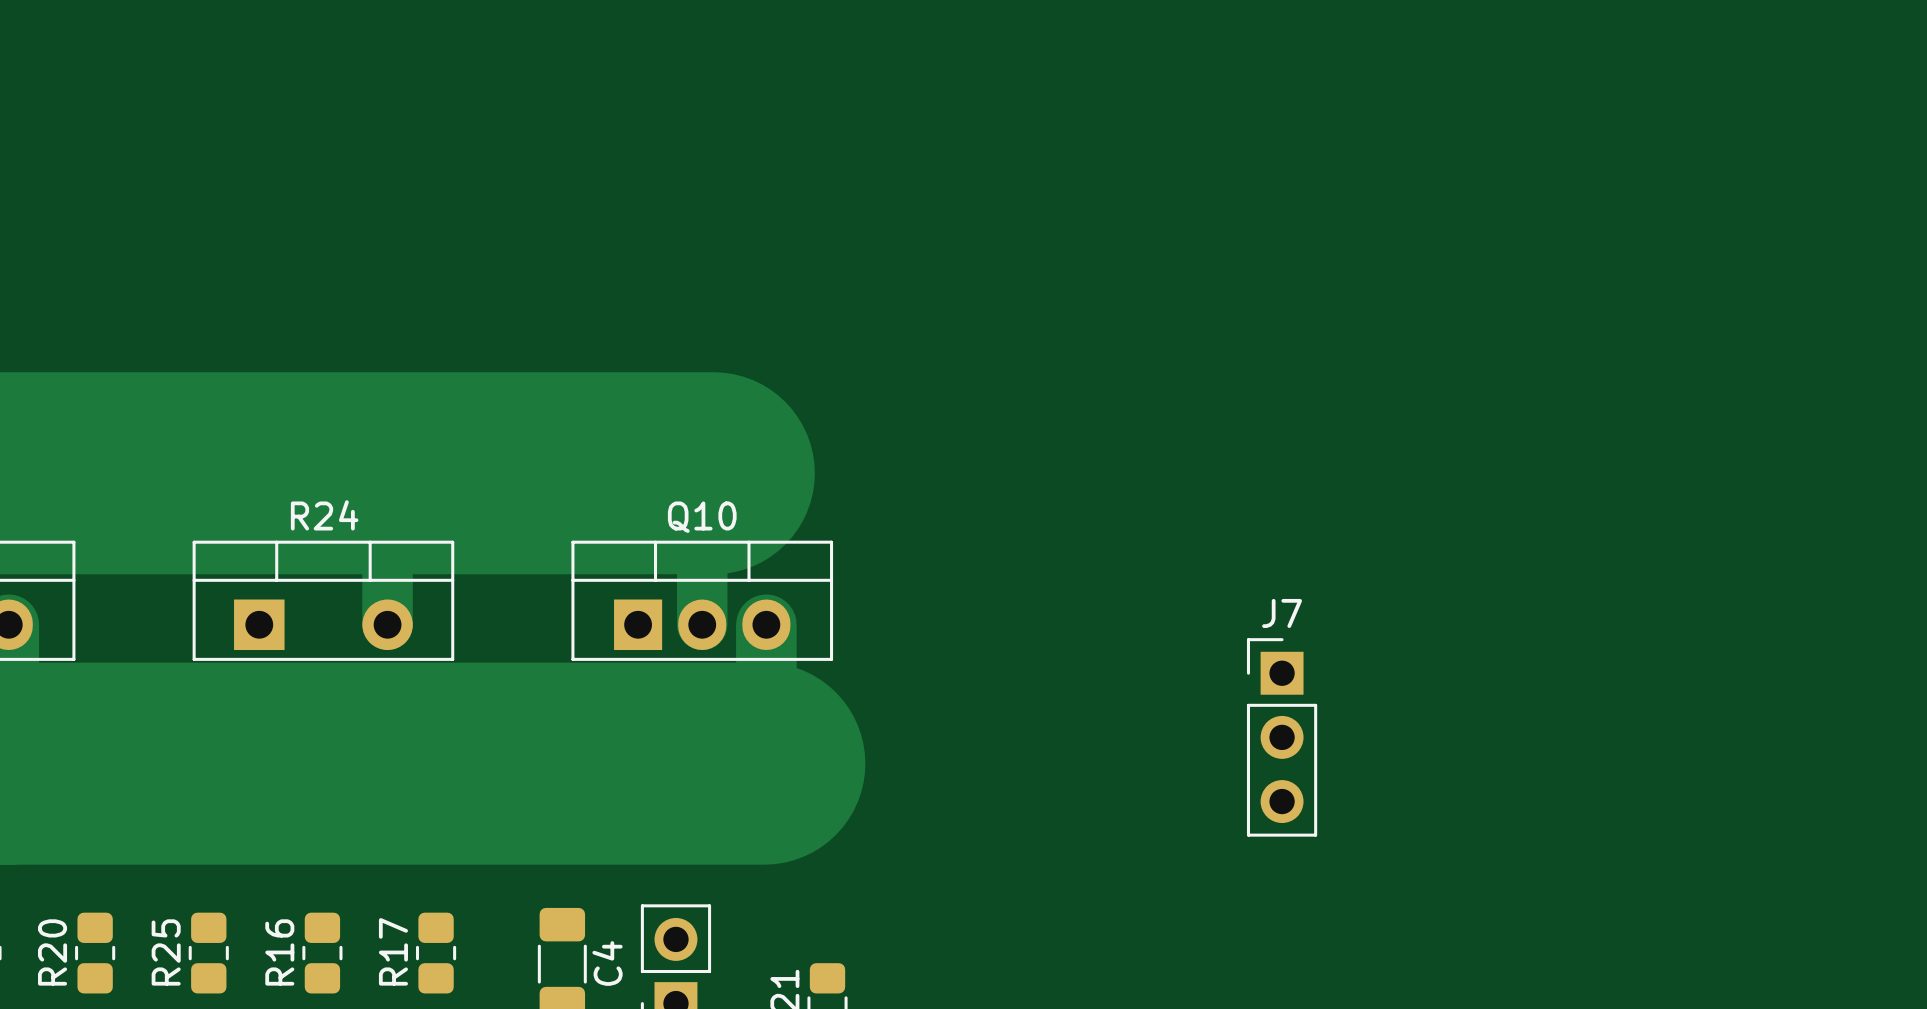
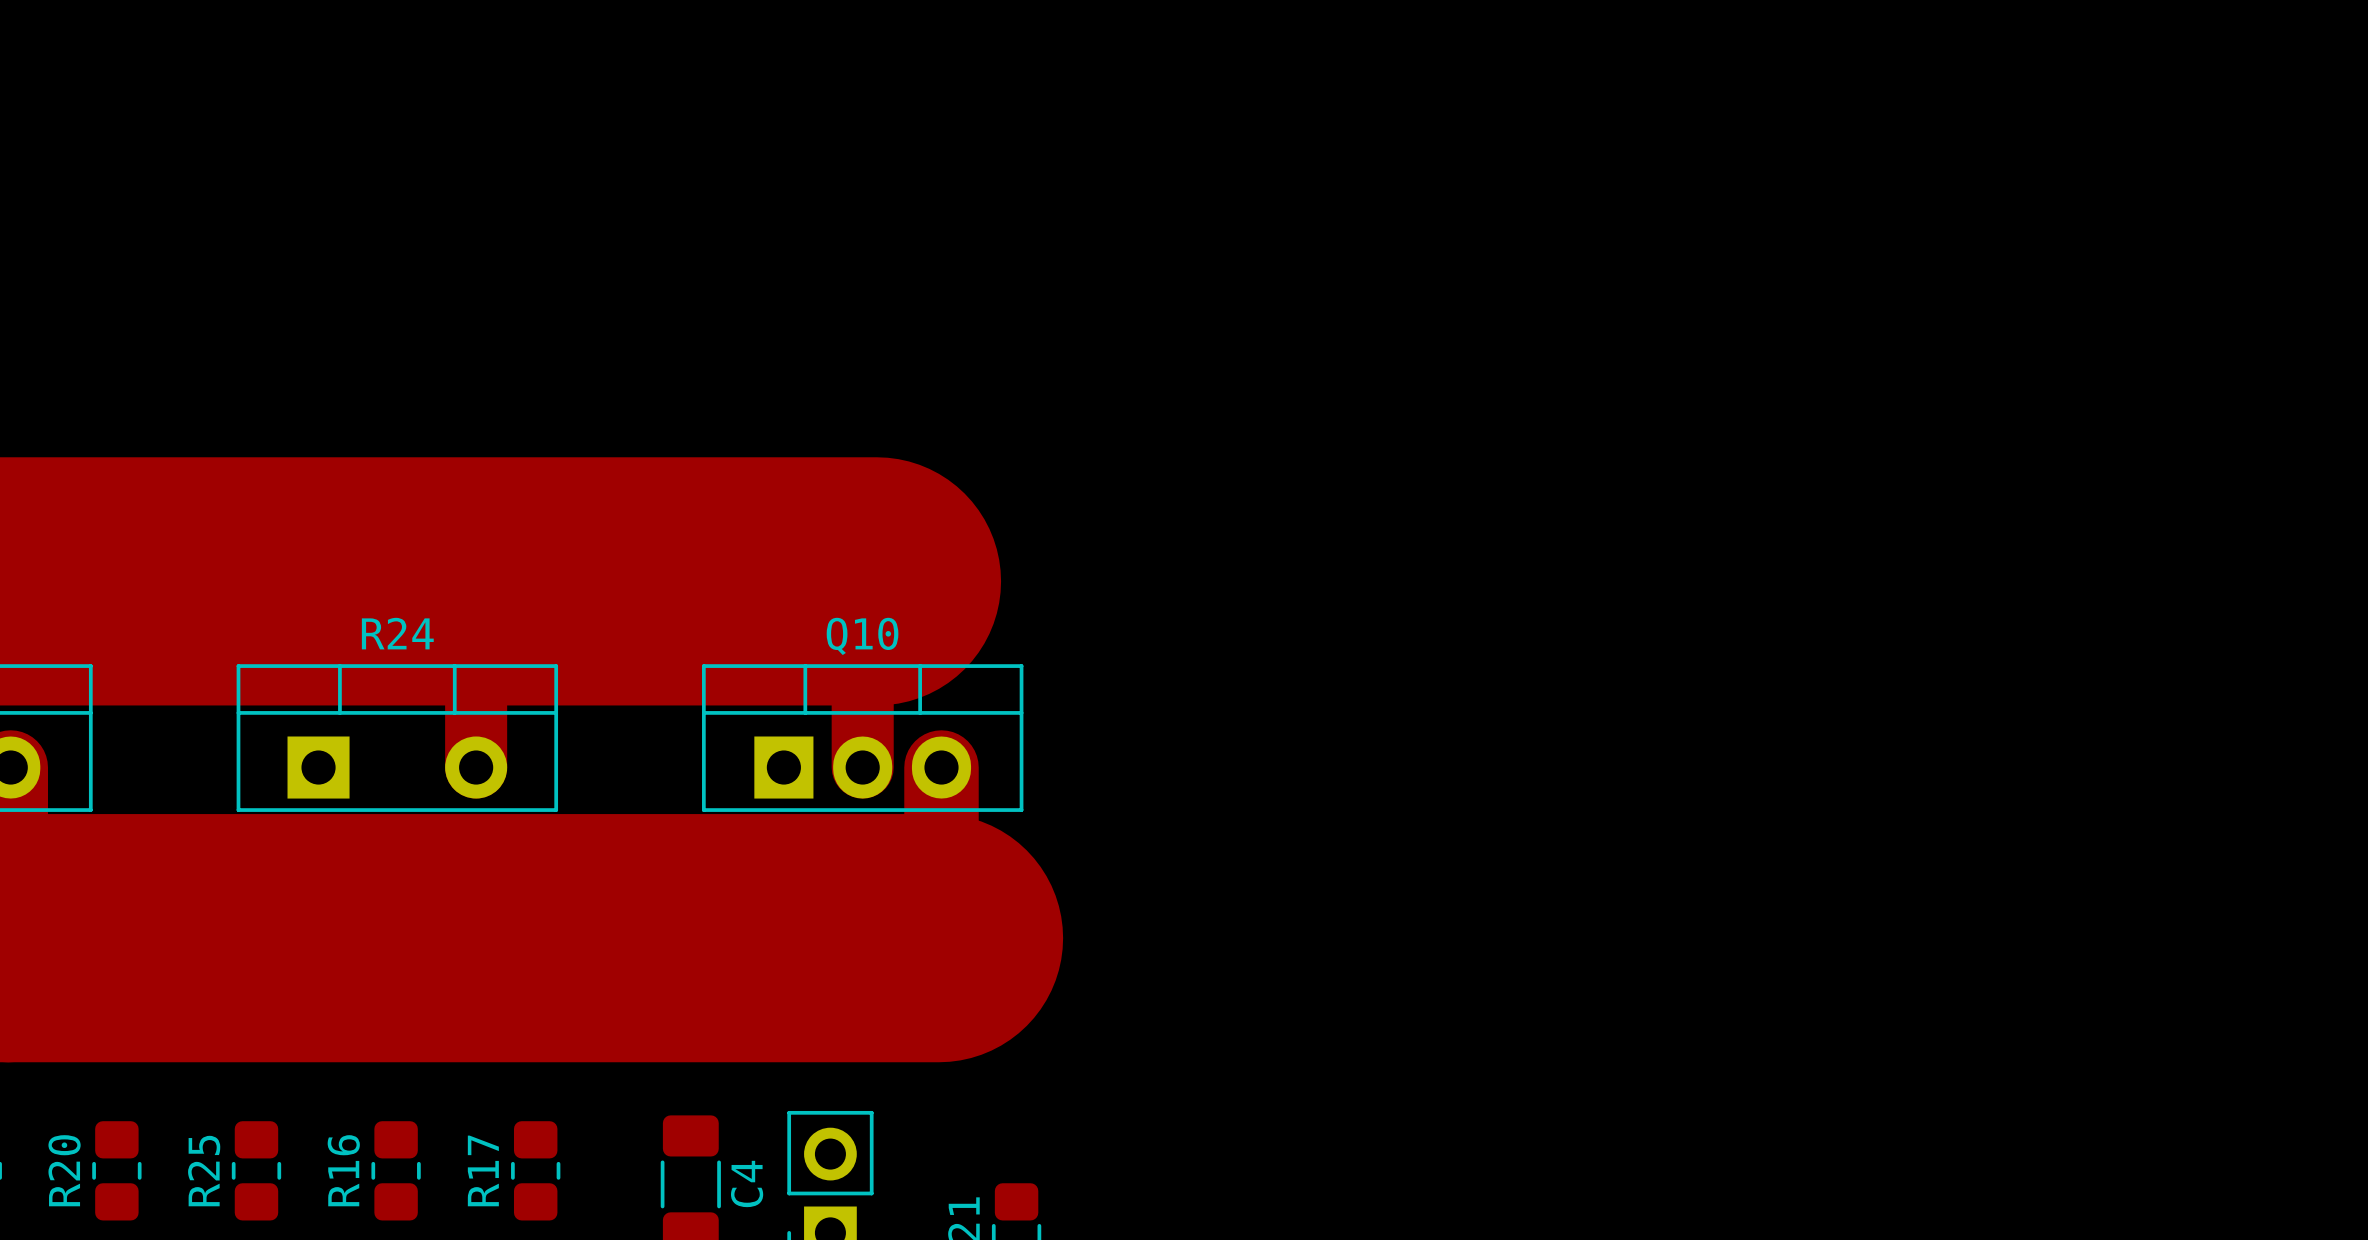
J7: (1282, 737) -> none

